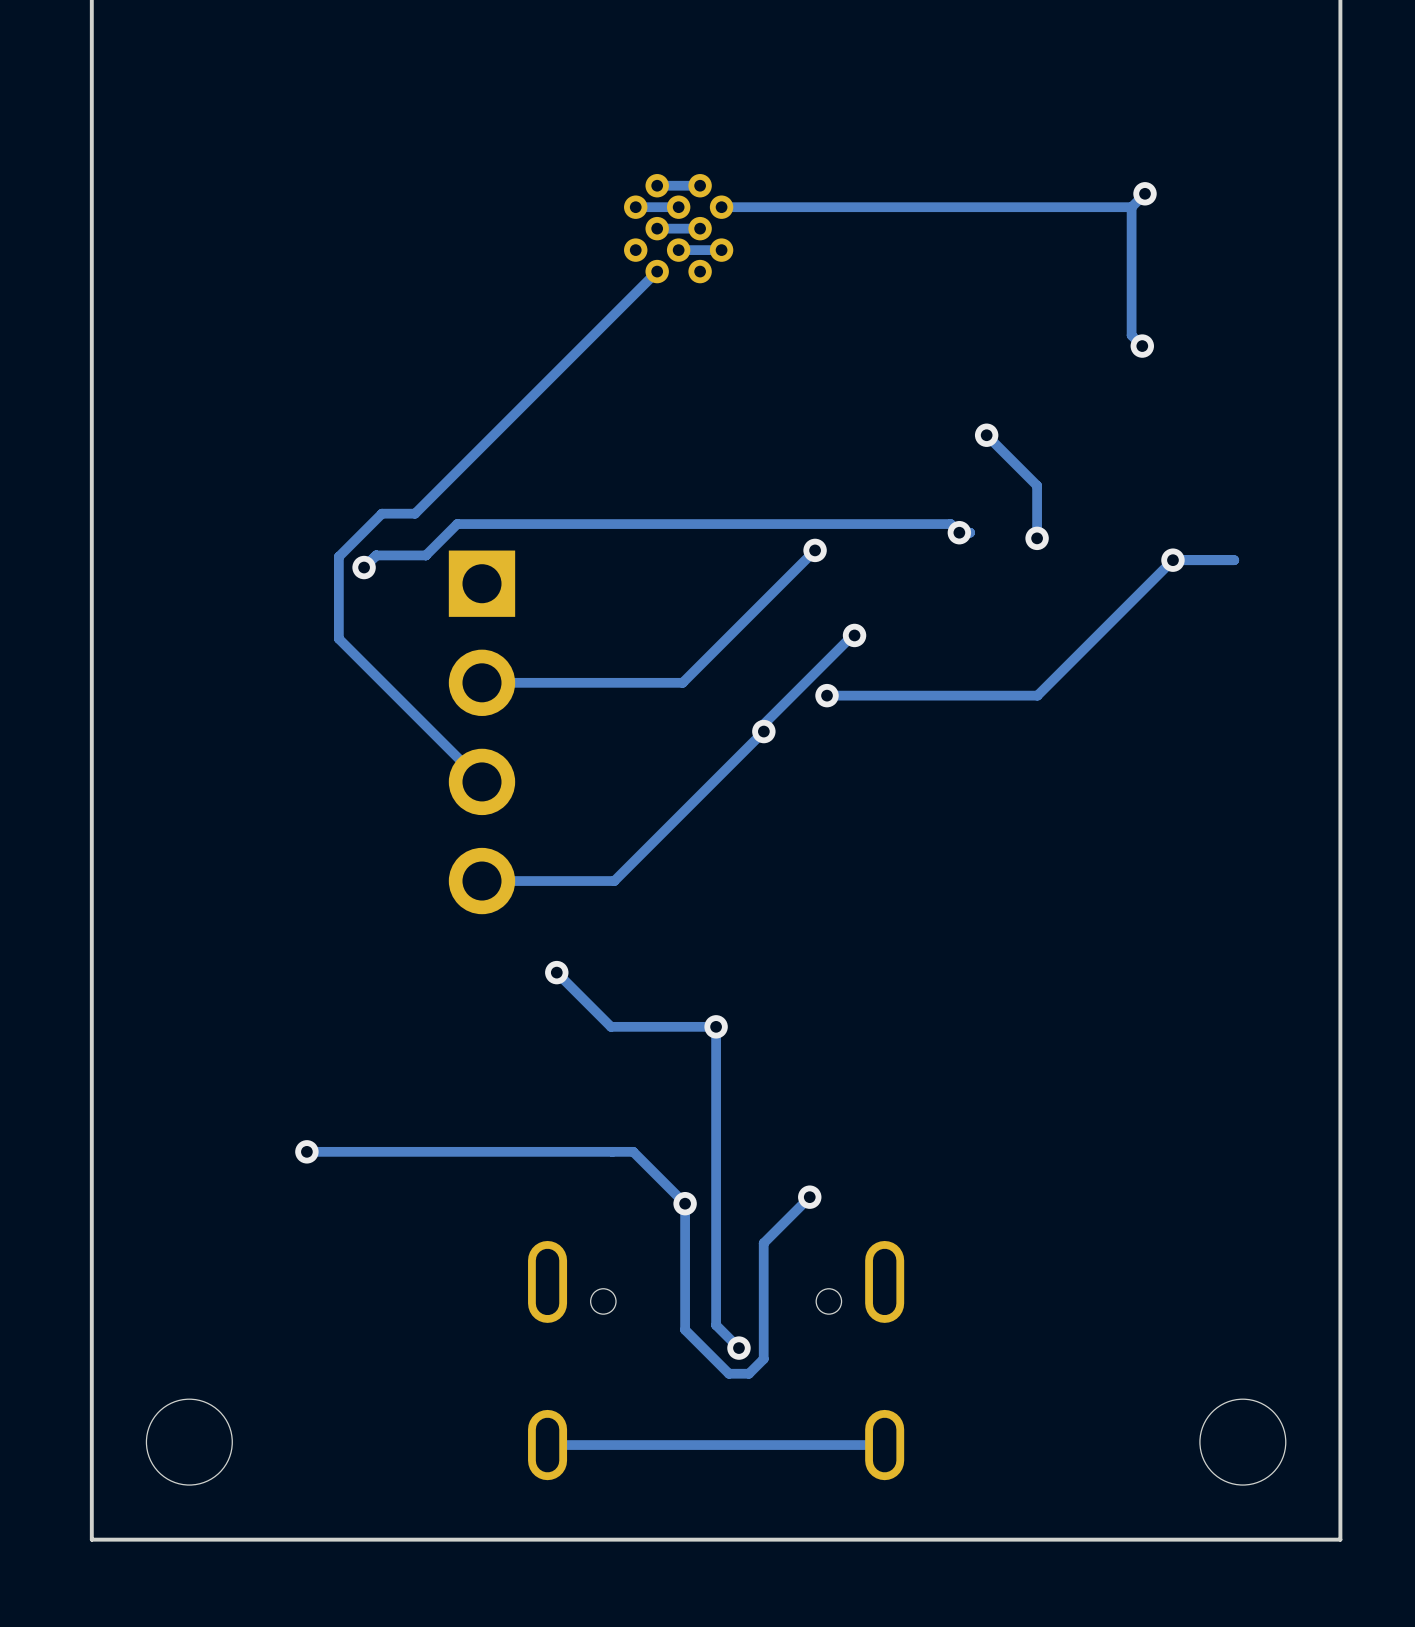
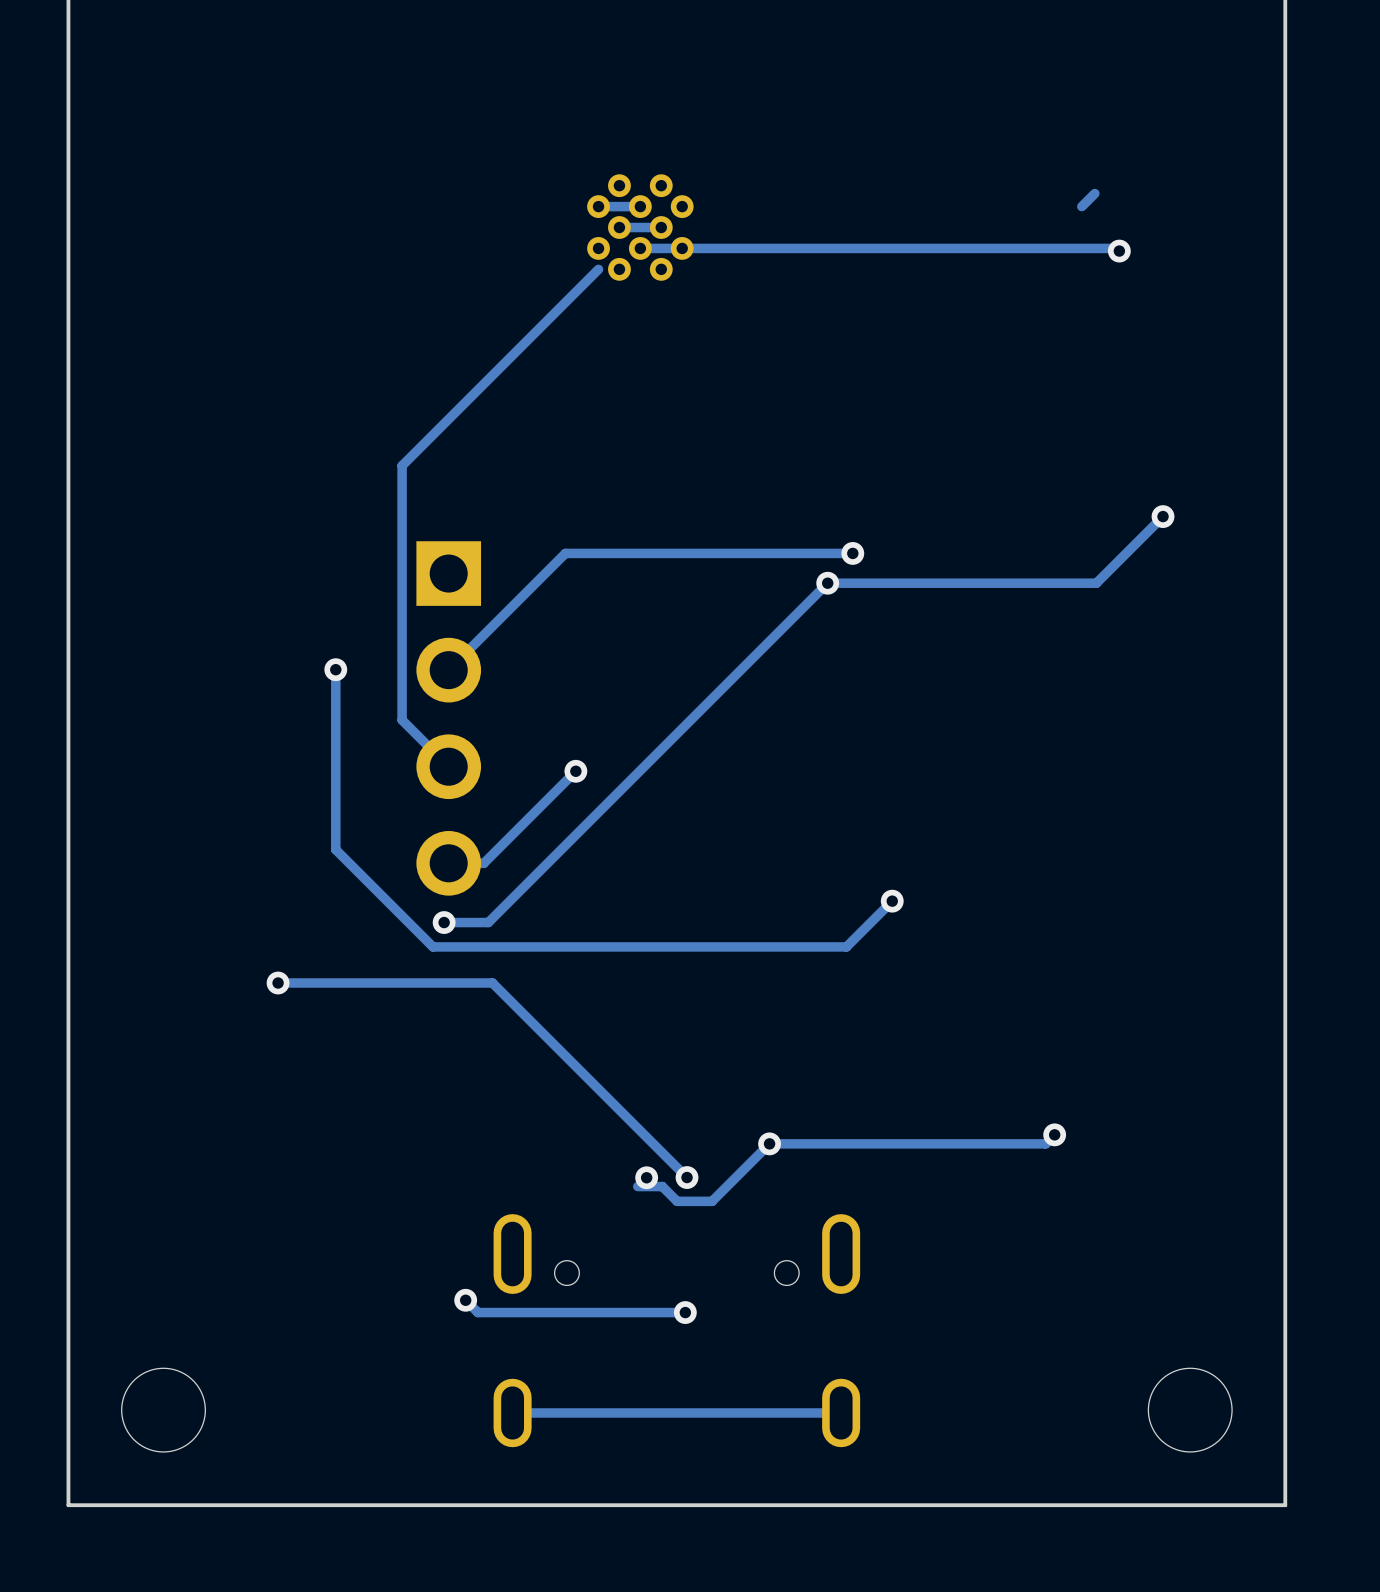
track: (700, 185) (657, 185) -> none
via: (1145, 193) -> none
track: (721, 207) (1131, 207) (1131, 335) (1142, 346) -> none
track: none -> (682, 248) (1116, 248) (1119, 251)
via: none -> (1119, 251)
track: (657, 271) (415, 513) (381, 513) (338, 556) (338, 638) (434, 734) -> (598, 269) (402, 465) (402, 720)
via: (1142, 346) -> none
track: (986, 435) (1037, 485) (1037, 538) -> none
via: (986, 435) -> none
track: none -> (1163, 516) (1096, 583) (827, 583) (488, 922) (444, 922)
via: (959, 532) -> none
track: (970, 532) (959, 532) (950, 524) (457, 524) (425, 555) (376, 555) (364, 567) -> none
via: (1037, 538) -> none
track: (815, 550) (682, 682) (481, 682) -> (852, 553) (565, 553) (448, 670)
via: (815, 550) -> none
via position: (1172, 560) -> (1163, 516)
track: (1234, 560) (1172, 560) (1037, 695) (827, 695) -> none
via: none -> (852, 553)
via position: (364, 567) -> (335, 669)
via: none -> (827, 583)
track: (854, 635) (763, 724) (763, 731) (614, 881) (518, 881) -> (575, 771) (483, 863)
via: (854, 635) -> none
track: none -> (335, 669) (335, 849) (433, 946) (846, 946) (892, 901)
via: (827, 695) -> none
via: (763, 731) -> none
via: none -> (575, 771)
via: none -> (892, 901)
track: (556, 972) (611, 1026) (716, 1026) (716, 1325) (738, 1348) -> none
via position: (556, 972) -> (444, 922)
track: none -> (278, 983) (492, 983) (687, 1177)
via: none -> (278, 983)
via: (716, 1026) -> none
track: (306, 1151) (633, 1151) (685, 1203) (685, 1329) (728, 1373) (748, 1373) (763, 1359) (763, 1243) (809, 1197) -> none
via: (306, 1151) -> none
track: none -> (1054, 1134) (1045, 1143) (769, 1143) (712, 1201) (677, 1201) (662, 1186) (637, 1186)
via: none -> (1054, 1134)
via position: (809, 1197) -> (769, 1143)
via: none -> (687, 1177)
track: none -> (465, 1300) (477, 1312) (685, 1312)
via: none -> (465, 1300)
via position: (738, 1348) -> (685, 1312)

